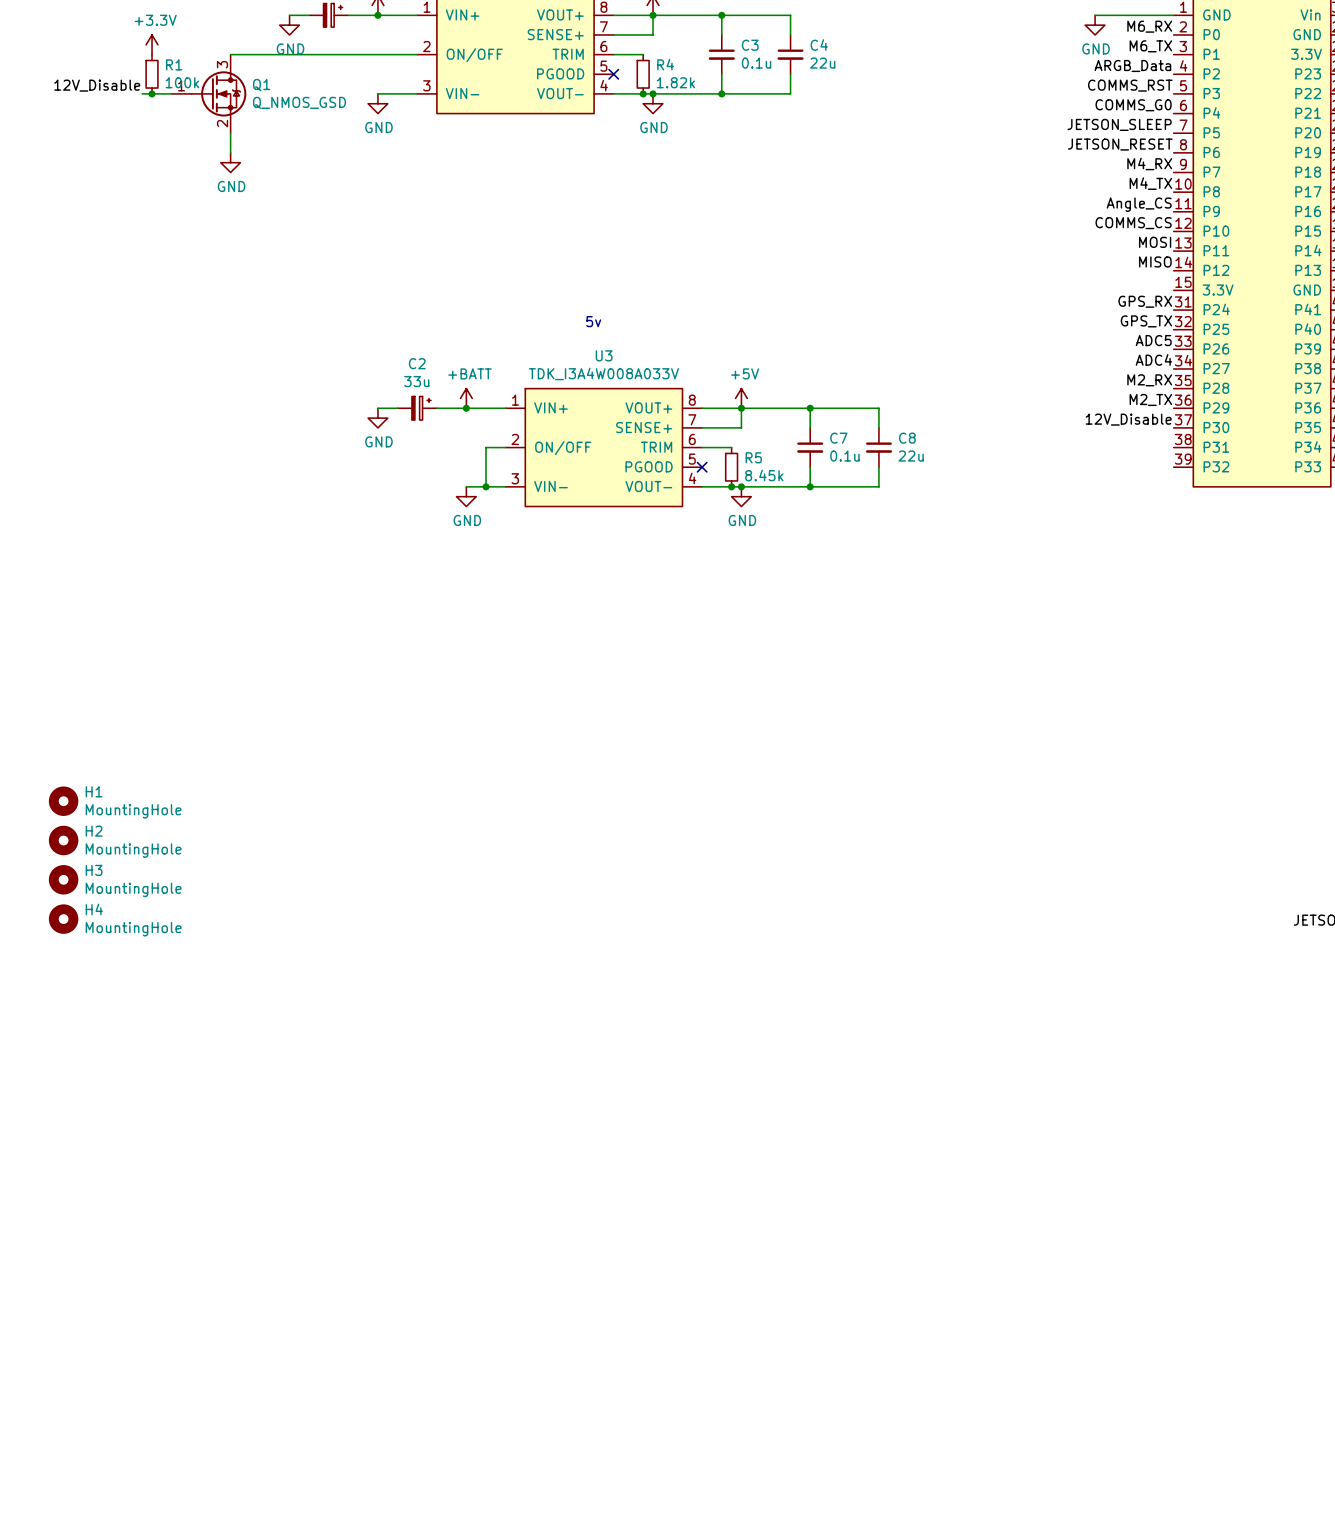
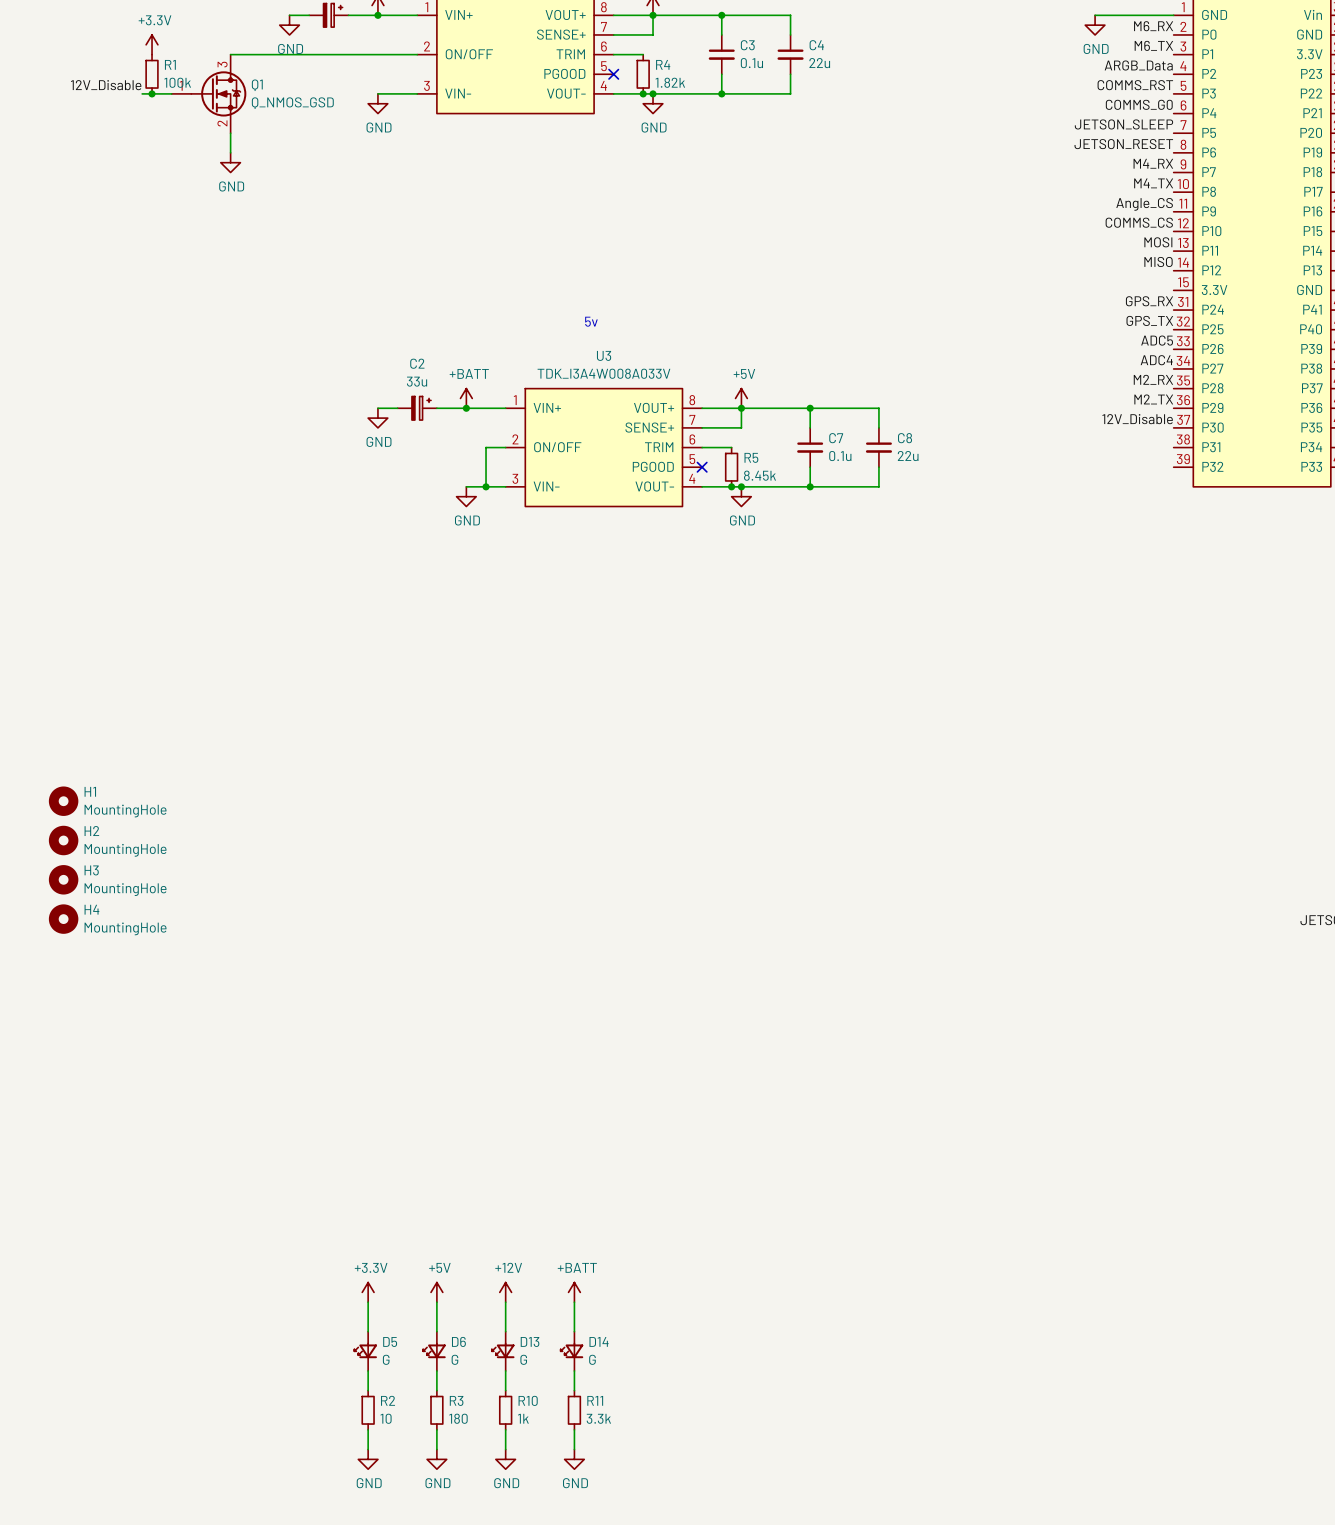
power symbol: none -> +3.3V (368, 1292)
power symbol: none -> +5V (436, 1292)
power symbol: none -> +12V (505, 1292)
power symbol: none -> +BATT (574, 1292)
wire: none -> (368, 1302) (368, 1331)
wire: none -> (436, 1302) (436, 1331)
wire: none -> (505, 1302) (505, 1331)
wire: none -> (574, 1302) (574, 1331)
D5: none -> G (365, 1351)
D6: none -> G (434, 1351)
D13: none -> G (503, 1351)
D14: none -> G (571, 1351)
wire: none -> (368, 1370) (368, 1390)
wire: none -> (436, 1370) (436, 1390)
wire: none -> (505, 1370) (505, 1390)
wire: none -> (574, 1370) (574, 1390)
R2: none -> 10 (368, 1410)
R3: none -> 180 (436, 1410)
R10: none -> 1k (505, 1410)
R11: none -> 3.3k (574, 1410)
wire: none -> (368, 1429) (368, 1449)
wire: none -> (436, 1429) (436, 1449)
wire: none -> (505, 1429) (505, 1449)
wire: none -> (574, 1429) (574, 1449)
power symbol: none -> GND (368, 1459)
power symbol: none -> GND (436, 1459)
power symbol: none -> GND (505, 1459)
power symbol: none -> GND (574, 1459)

